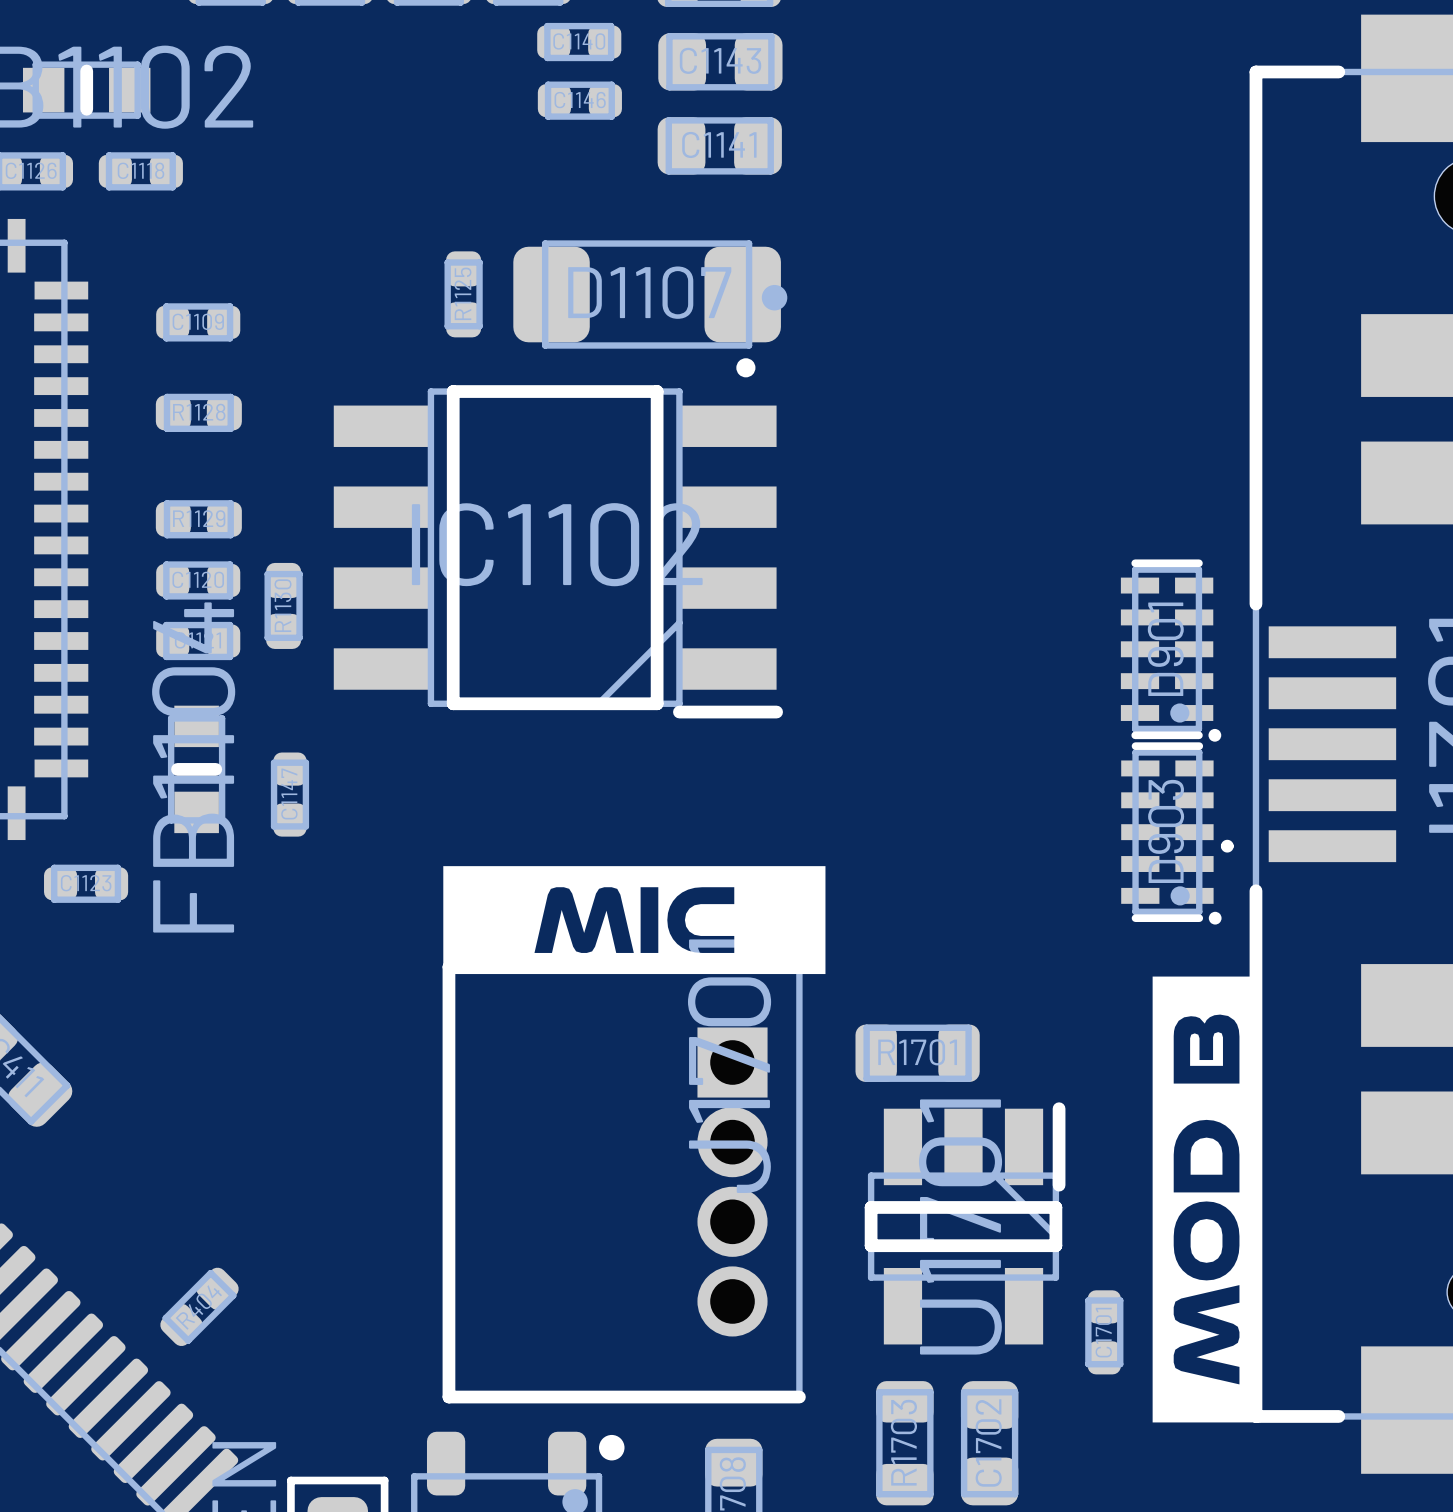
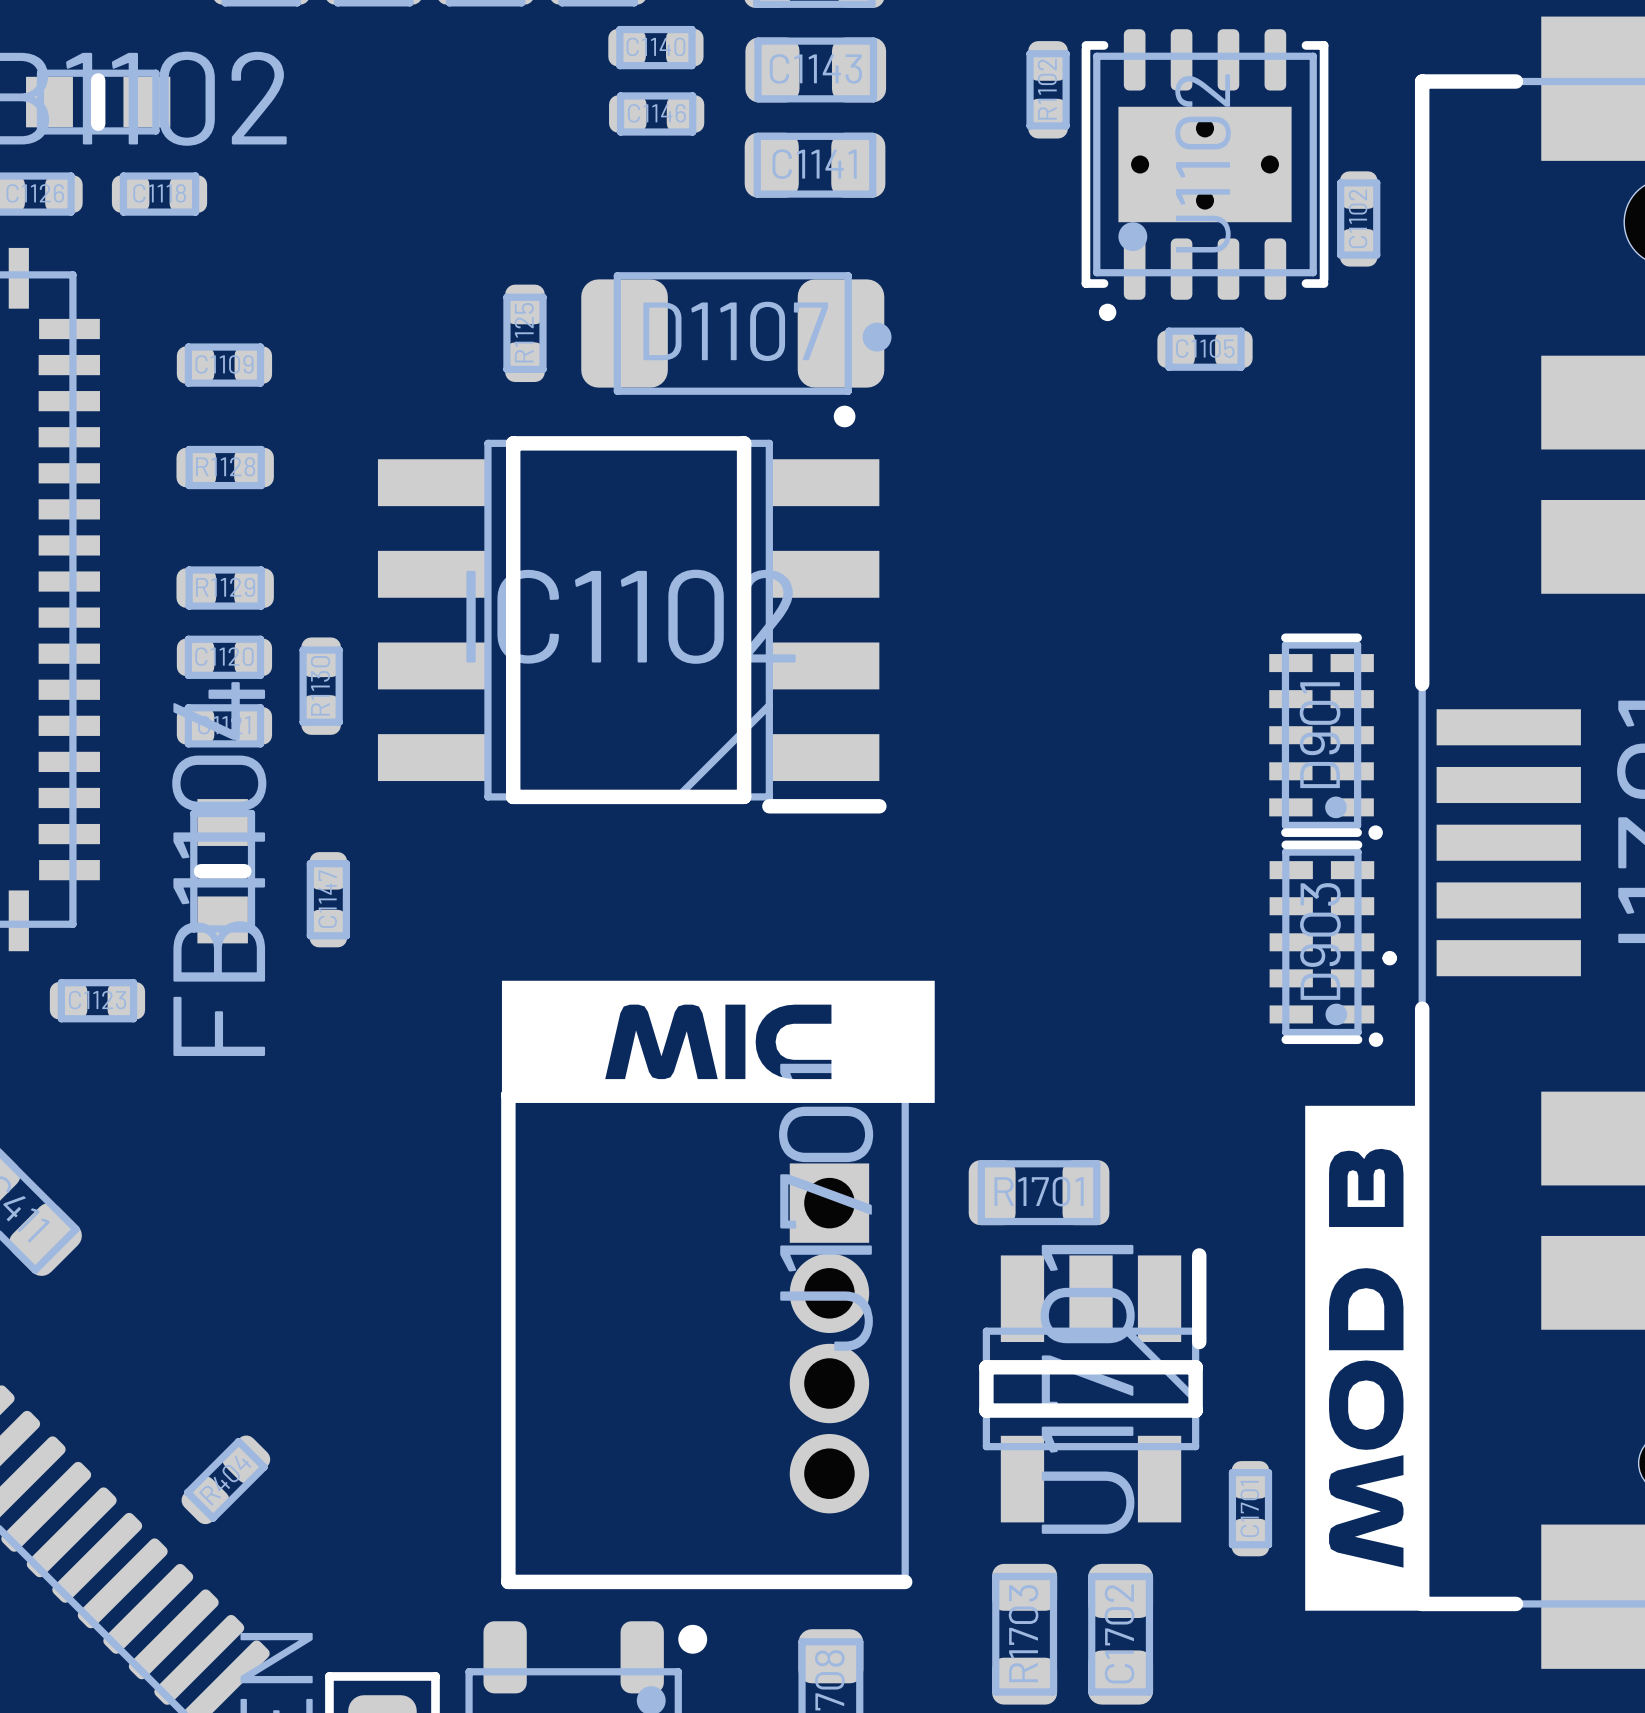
part: none -> (1048, 89)
part: none -> (1205, 175)
part: none -> (1358, 218)
part: none -> (1205, 349)

